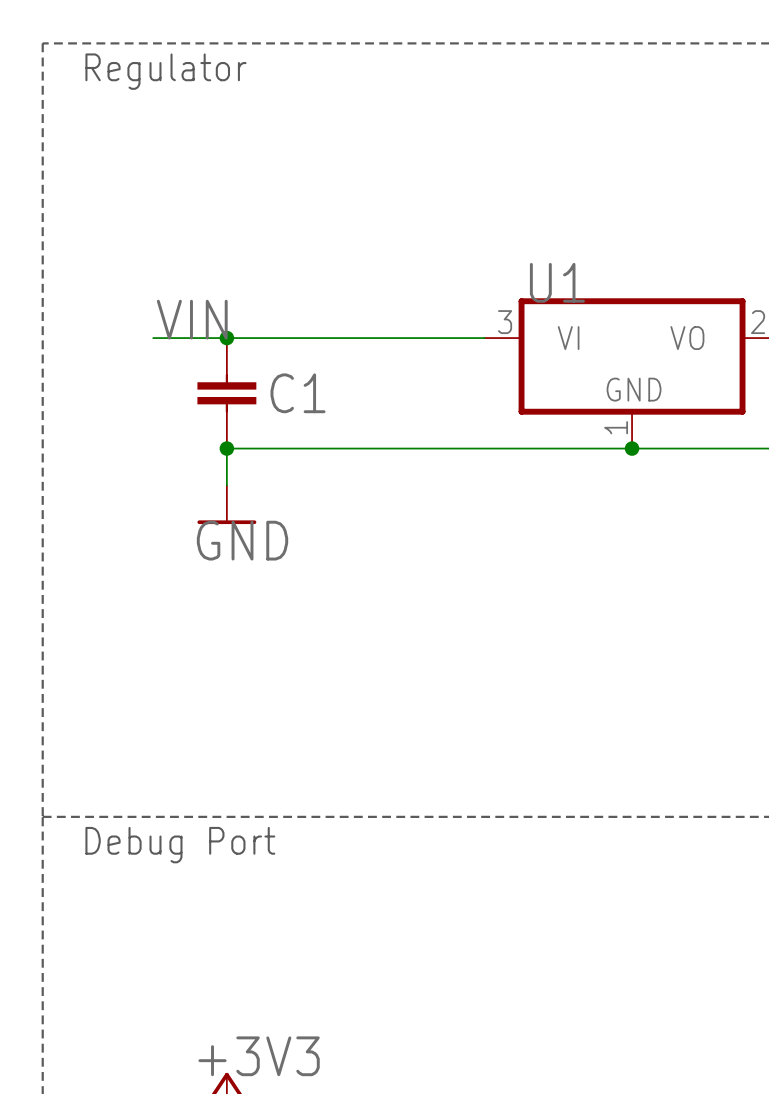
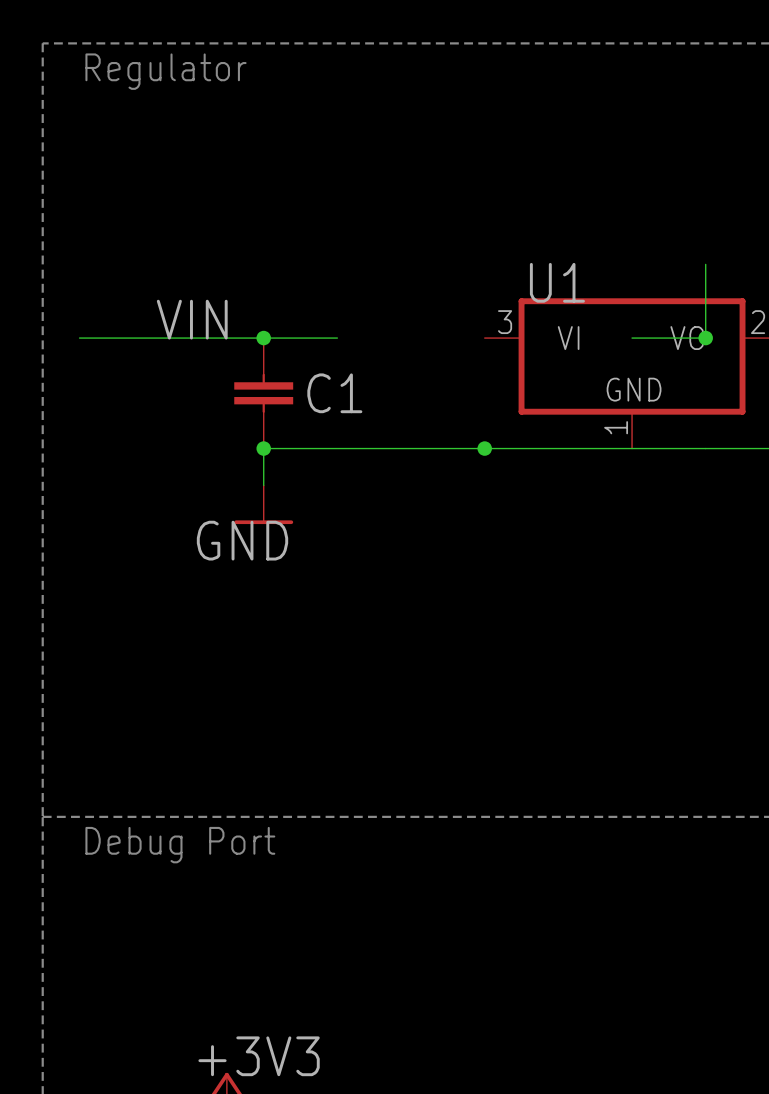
wire: none -> (705, 264) (705, 338) (632, 338)
wire: none -> (79, 338) (153, 338)
junction position: (226, 338) -> (263, 338)
wire: (337, 338) (484, 338) -> none
junction: none -> (705, 338)
C1 position: (226, 393) -> (263, 393)
junction position: (226, 448) -> (263, 448)
wire: (263, 448) (226, 448) (226, 485) -> (263, 448) (263, 485)
junction: none -> (484, 448)
junction: (632, 448) -> none
power symbol position: GND (226, 504) -> GND (263, 504)

